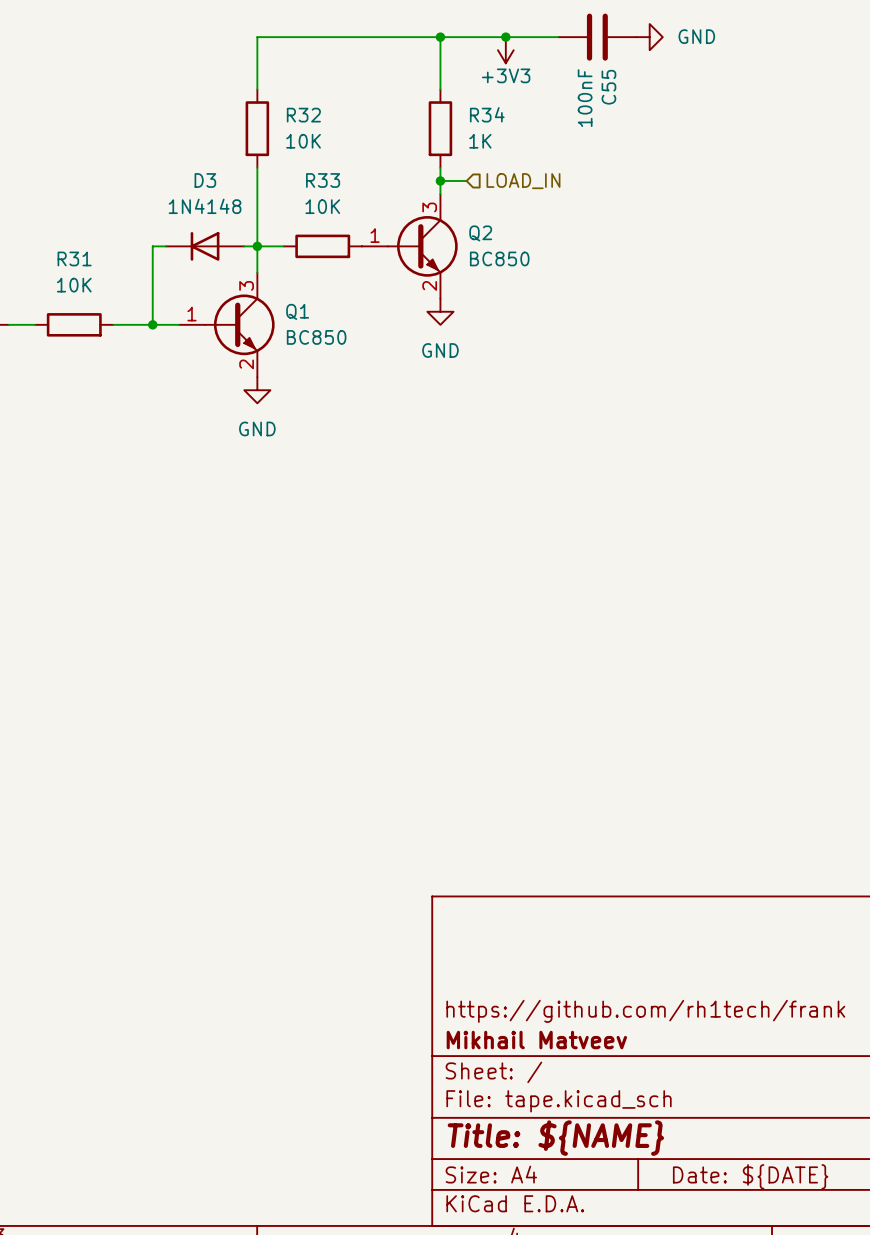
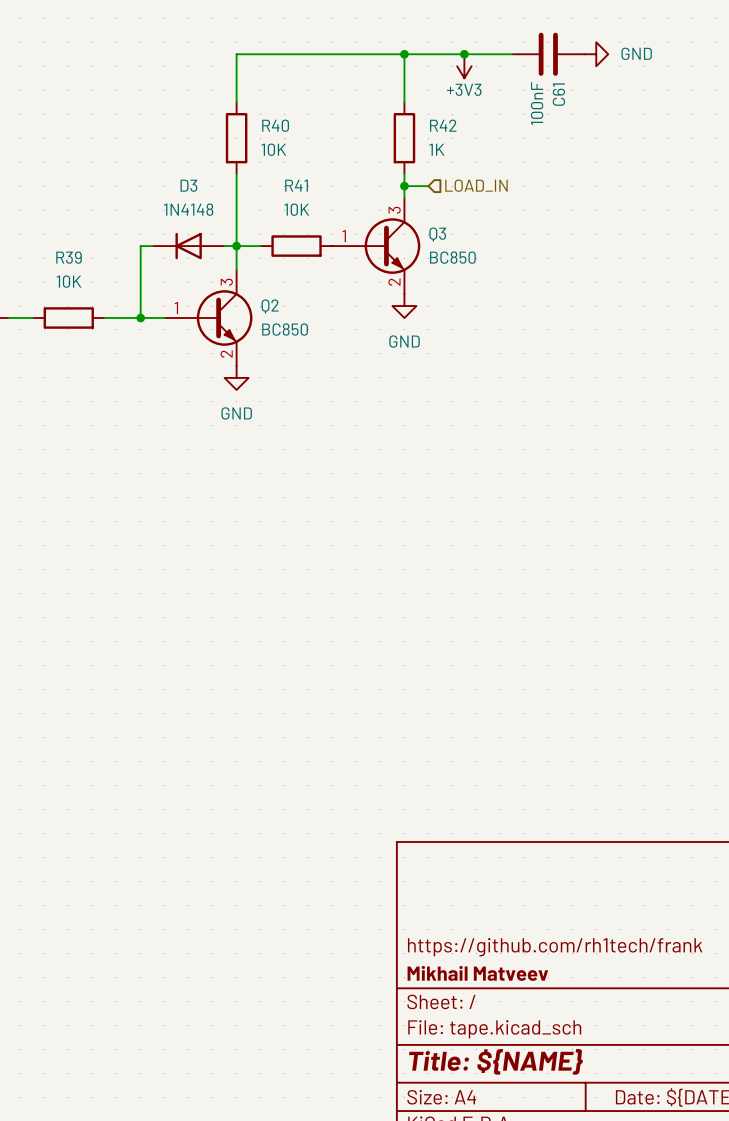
C55 name: C55 (608, 87) -> C61 (558, 94)
R34 name: R34 (487, 114) -> R42 (443, 125)
R32 name: R32 (303, 115) -> R40 (275, 125)
R33 name: R33 (323, 180) -> R41 (296, 185)
Q2 name: Q2 (480, 233) -> Q3 (437, 234)
R31 name: R31 (74, 258) -> R39 (69, 257)
Q1 name: Q1 (297, 311) -> Q2 (270, 306)

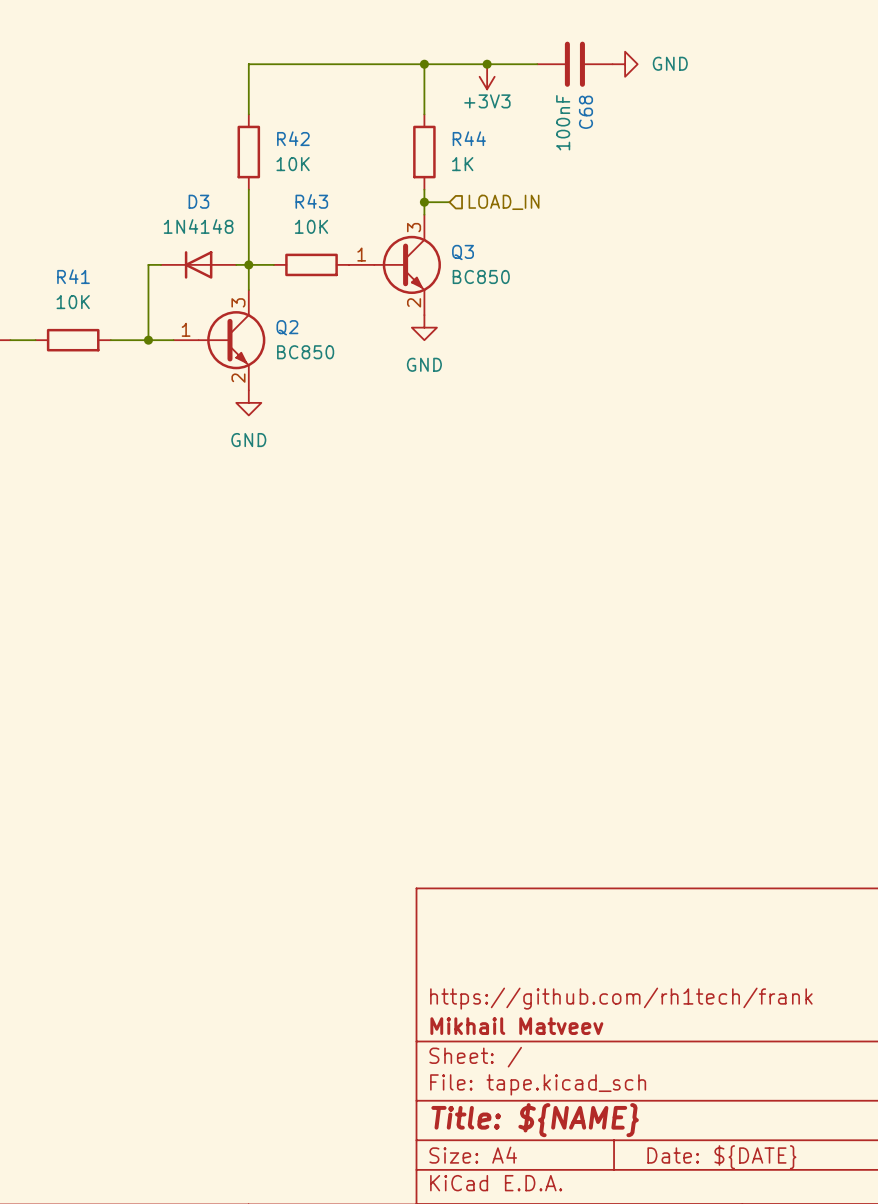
C61 name: C61 (558, 94) -> C68 (585, 112)
R40 name: R40 (275, 125) -> R42 (293, 138)
R42 name: R42 (443, 125) -> R44 (469, 138)
R41 name: R41 (296, 185) -> R43 (311, 201)
R39 name: R39 (69, 257) -> R41 (73, 276)

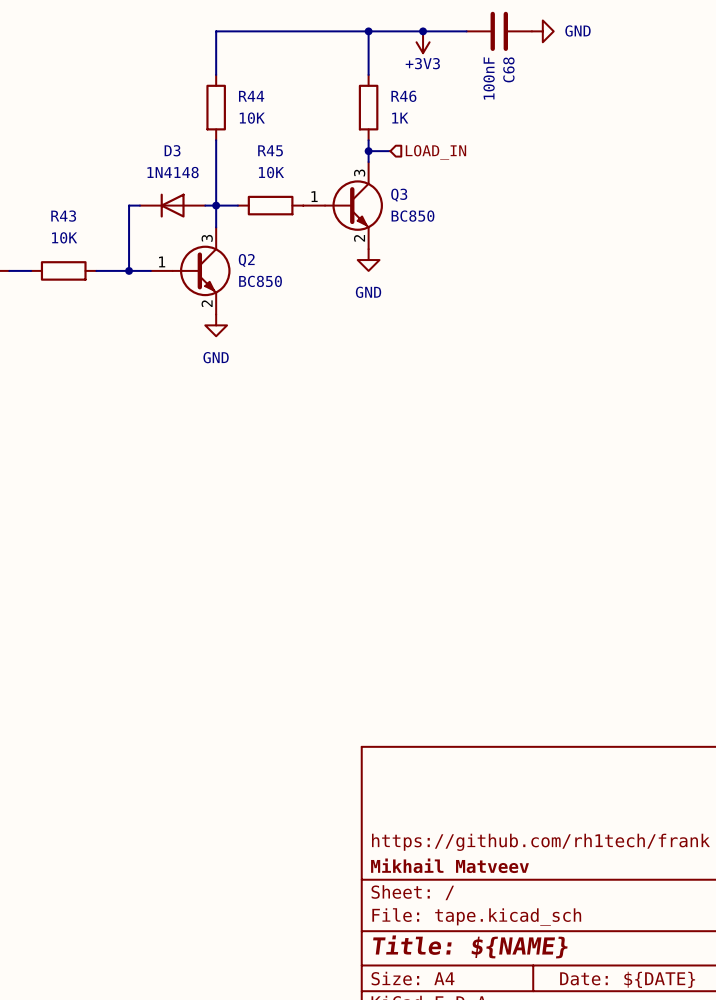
R42 name: R42 (293, 138) -> R44 (251, 96)
R44 name: R44 (469, 138) -> R46 (403, 96)
R43 name: R43 (311, 201) -> R45 (270, 150)
R41 name: R41 (73, 276) -> R43 (63, 216)

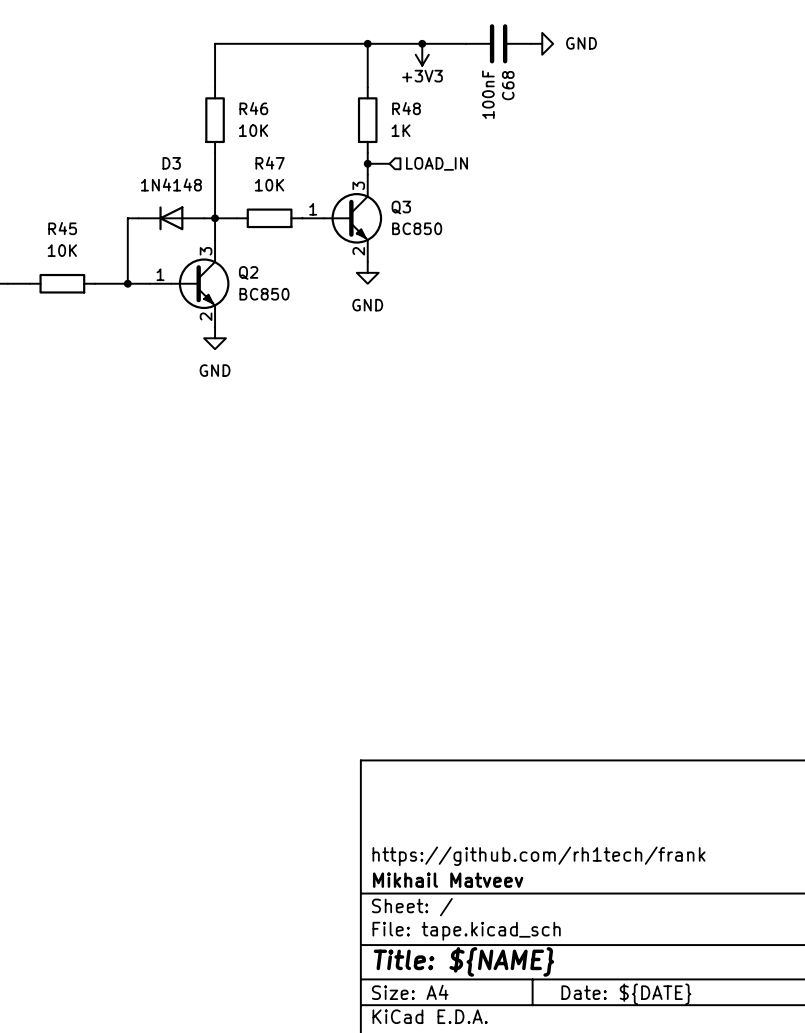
R44 name: R44 (251, 96) -> R46 (253, 108)
R46 name: R46 (403, 96) -> R48 (406, 108)
R45 name: R45 (270, 150) -> R47 (270, 163)
R43 name: R43 (63, 216) -> R45 (62, 228)

